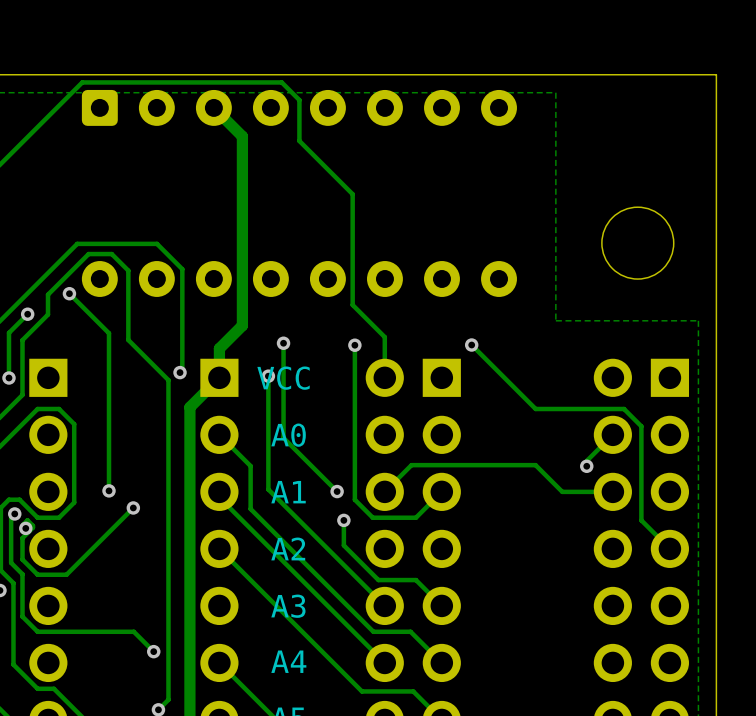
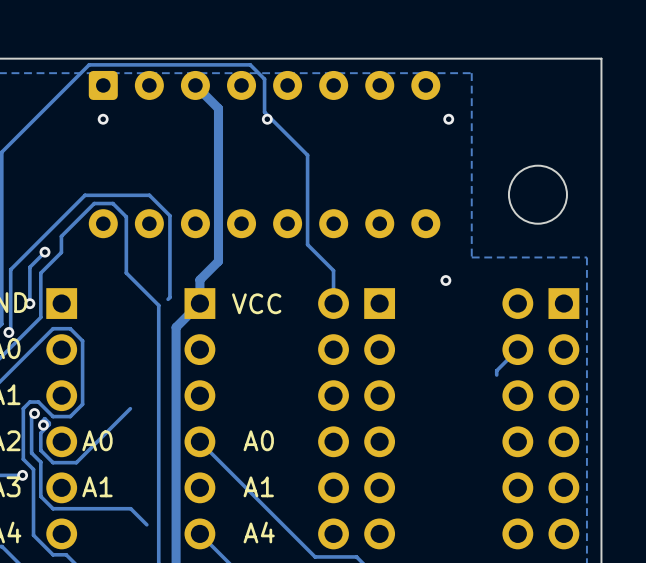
via: none -> (103, 119)
via: none -> (267, 119)
via: none -> (448, 119)
track: (69, 293) (109, 333) (109, 490) -> none
via: (69, 293) -> none
track: (283, 343) (283, 437) (337, 491) -> none
via: (283, 343) -> none
track: (354, 345) (354, 499) (372, 517) (415, 517) (441, 491) -> none
via: (354, 345) -> none
track: (471, 345) (535, 408) (624, 408) (641, 426) (641, 520) (669, 548) -> none
via position: (471, 345) -> (445, 280)
via: (180, 372) -> none
track: (268, 376) (268, 489) (384, 605) -> none
via: (268, 376) -> none
track: (219, 434) (250, 466) (250, 508) (373, 631) (410, 631) (441, 662) -> none
text position: A0 (288, 435) -> A0 (97, 440)
via: (586, 466) -> none
via: (109, 490) -> none
track: (219, 491) (219, 497) (384, 662) -> none
via: (337, 491) -> none
track: (612, 491) (562, 491) (535, 465) (411, 465) (384, 491) -> none
text position: A1 (288, 492) -> A1 (97, 486)
via: (133, 507) -> none
track: (343, 520) (343, 545) (378, 580) (415, 580) (441, 605) -> none
via: (343, 520) -> none
text: A2 (288, 548) -> A0 (258, 440)
text: A3 (288, 606) -> A1 (258, 486)
via: (153, 651) -> none

